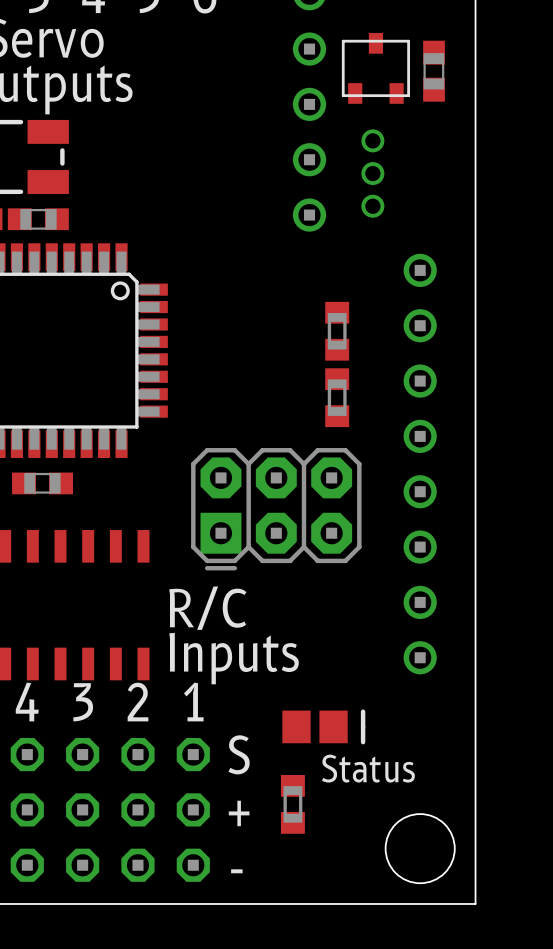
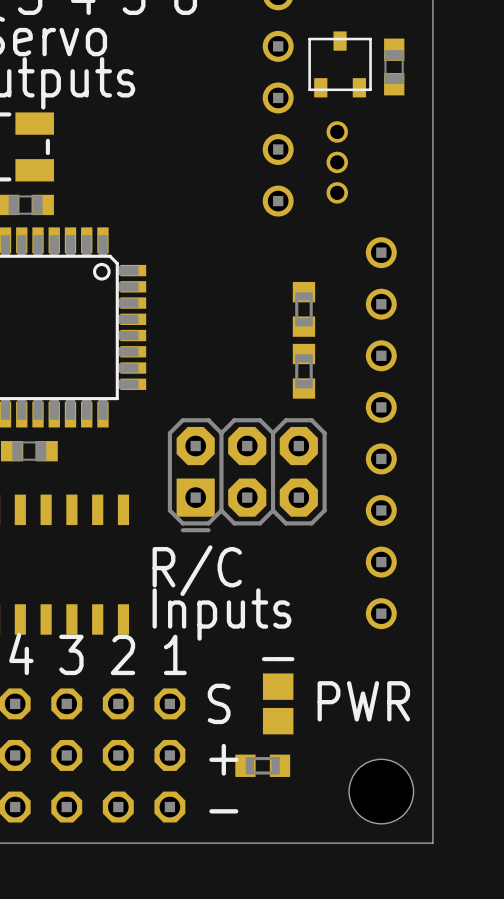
part rotation: 0° (323, 726) -> 90° counterclockwise (278, 695)
text: none -> PWR (363, 701)
text: Status (368, 768) -> none
part rotation: 0° (292, 804) -> 90° clockwise (262, 765)

